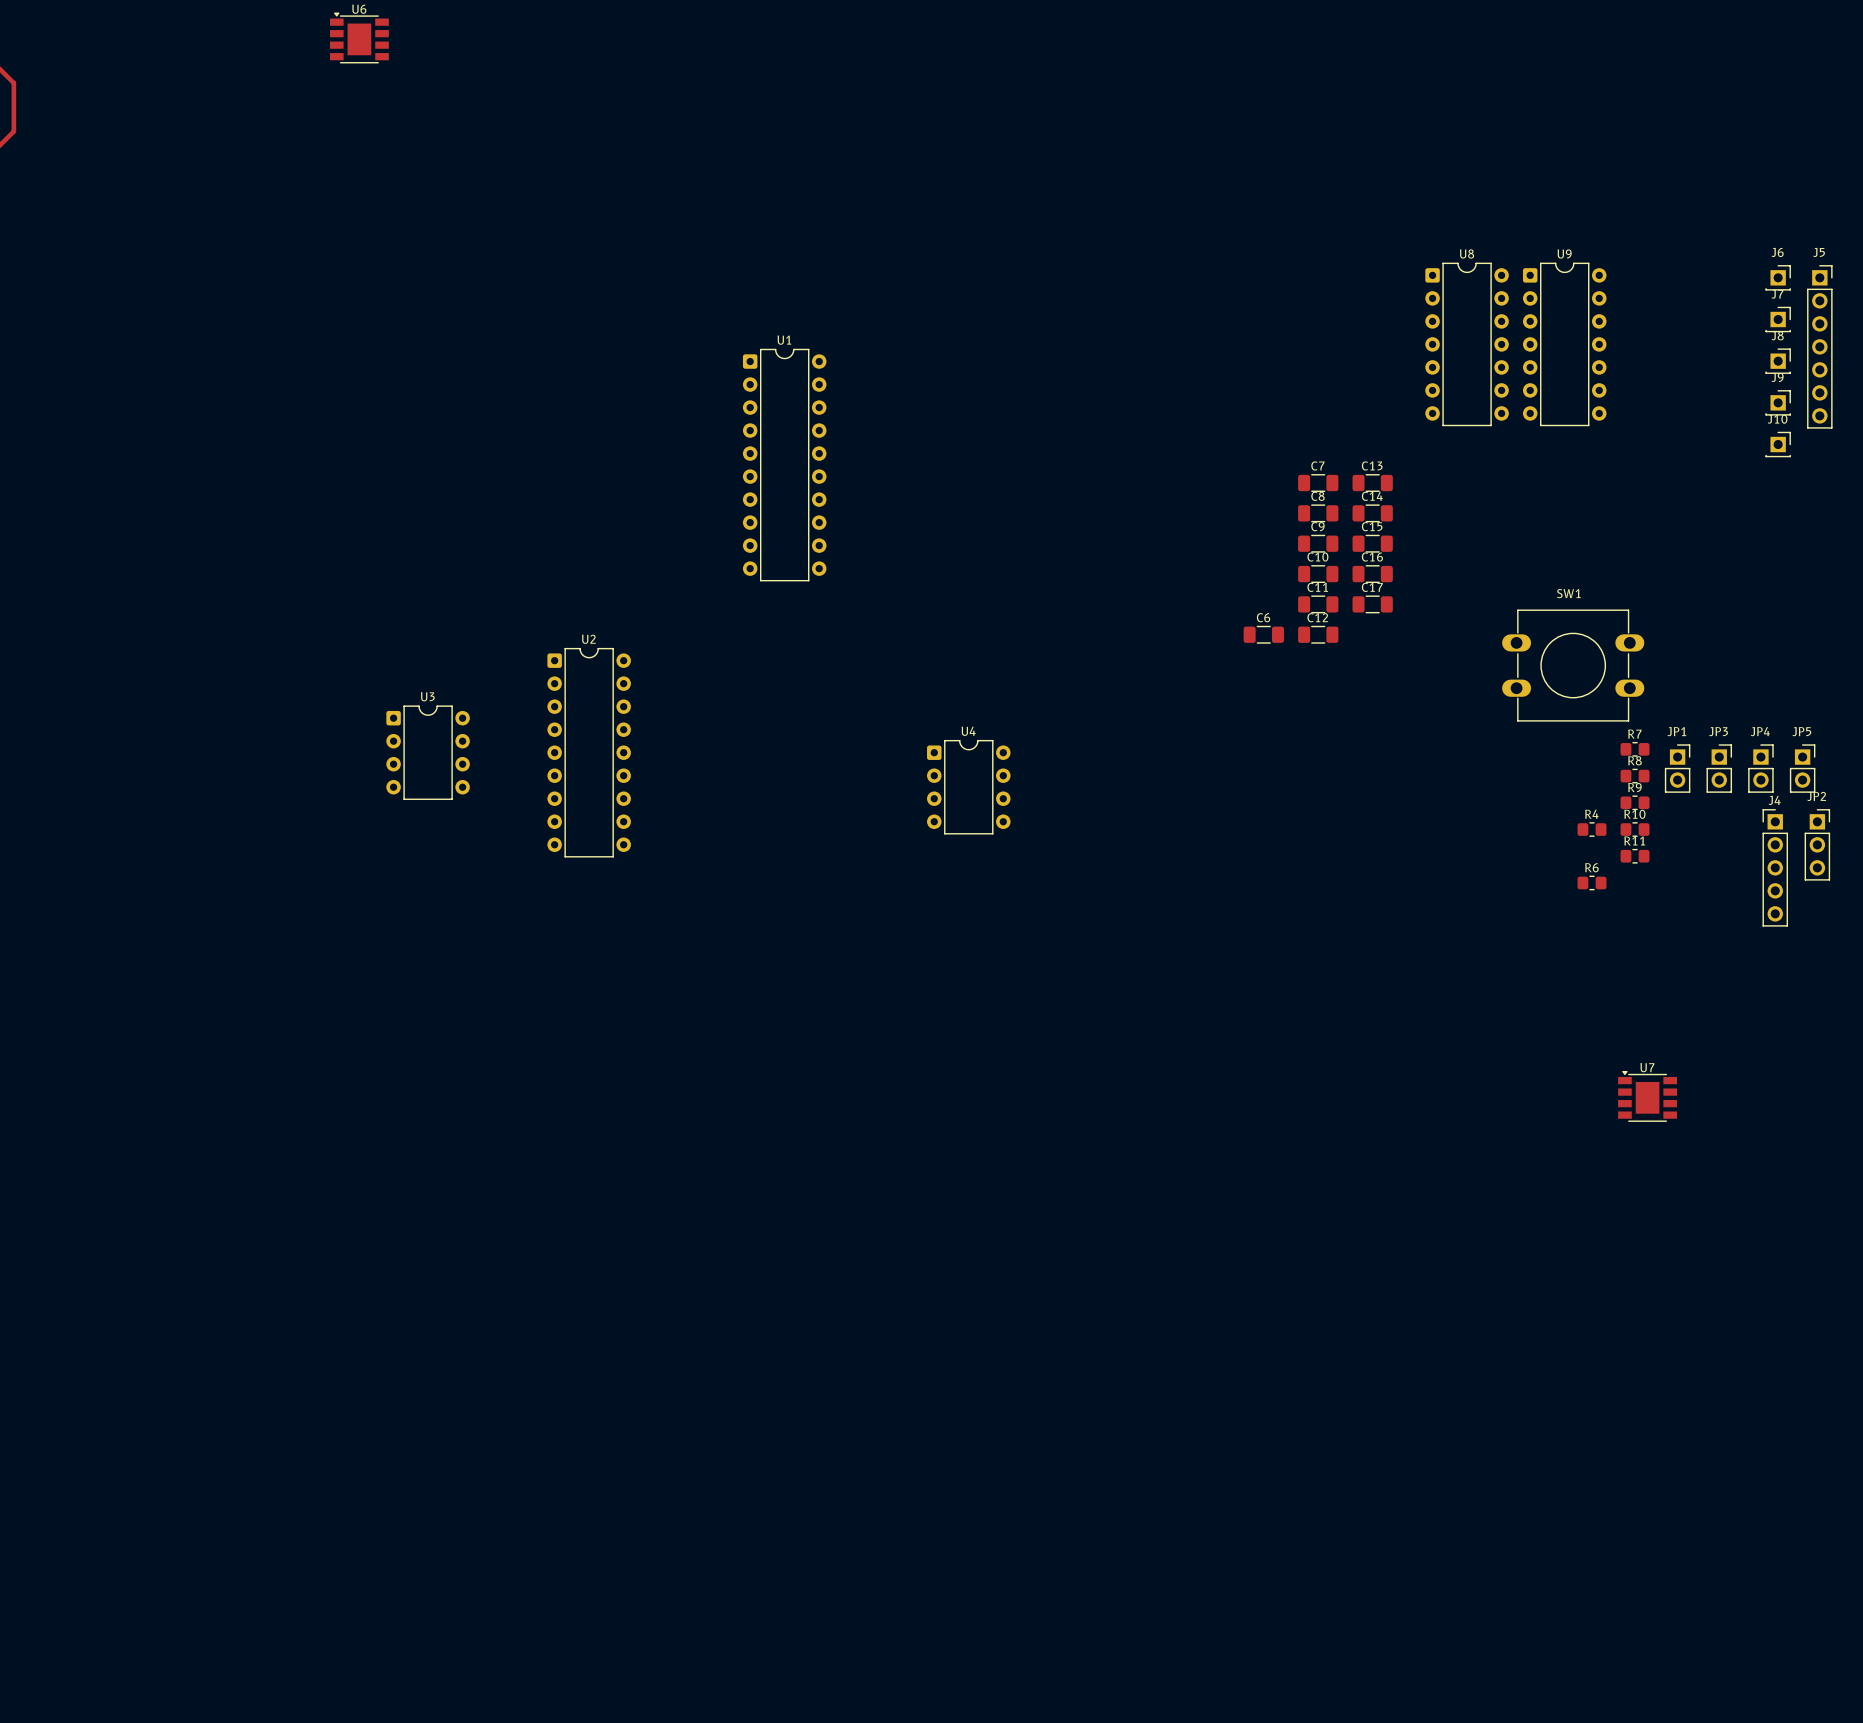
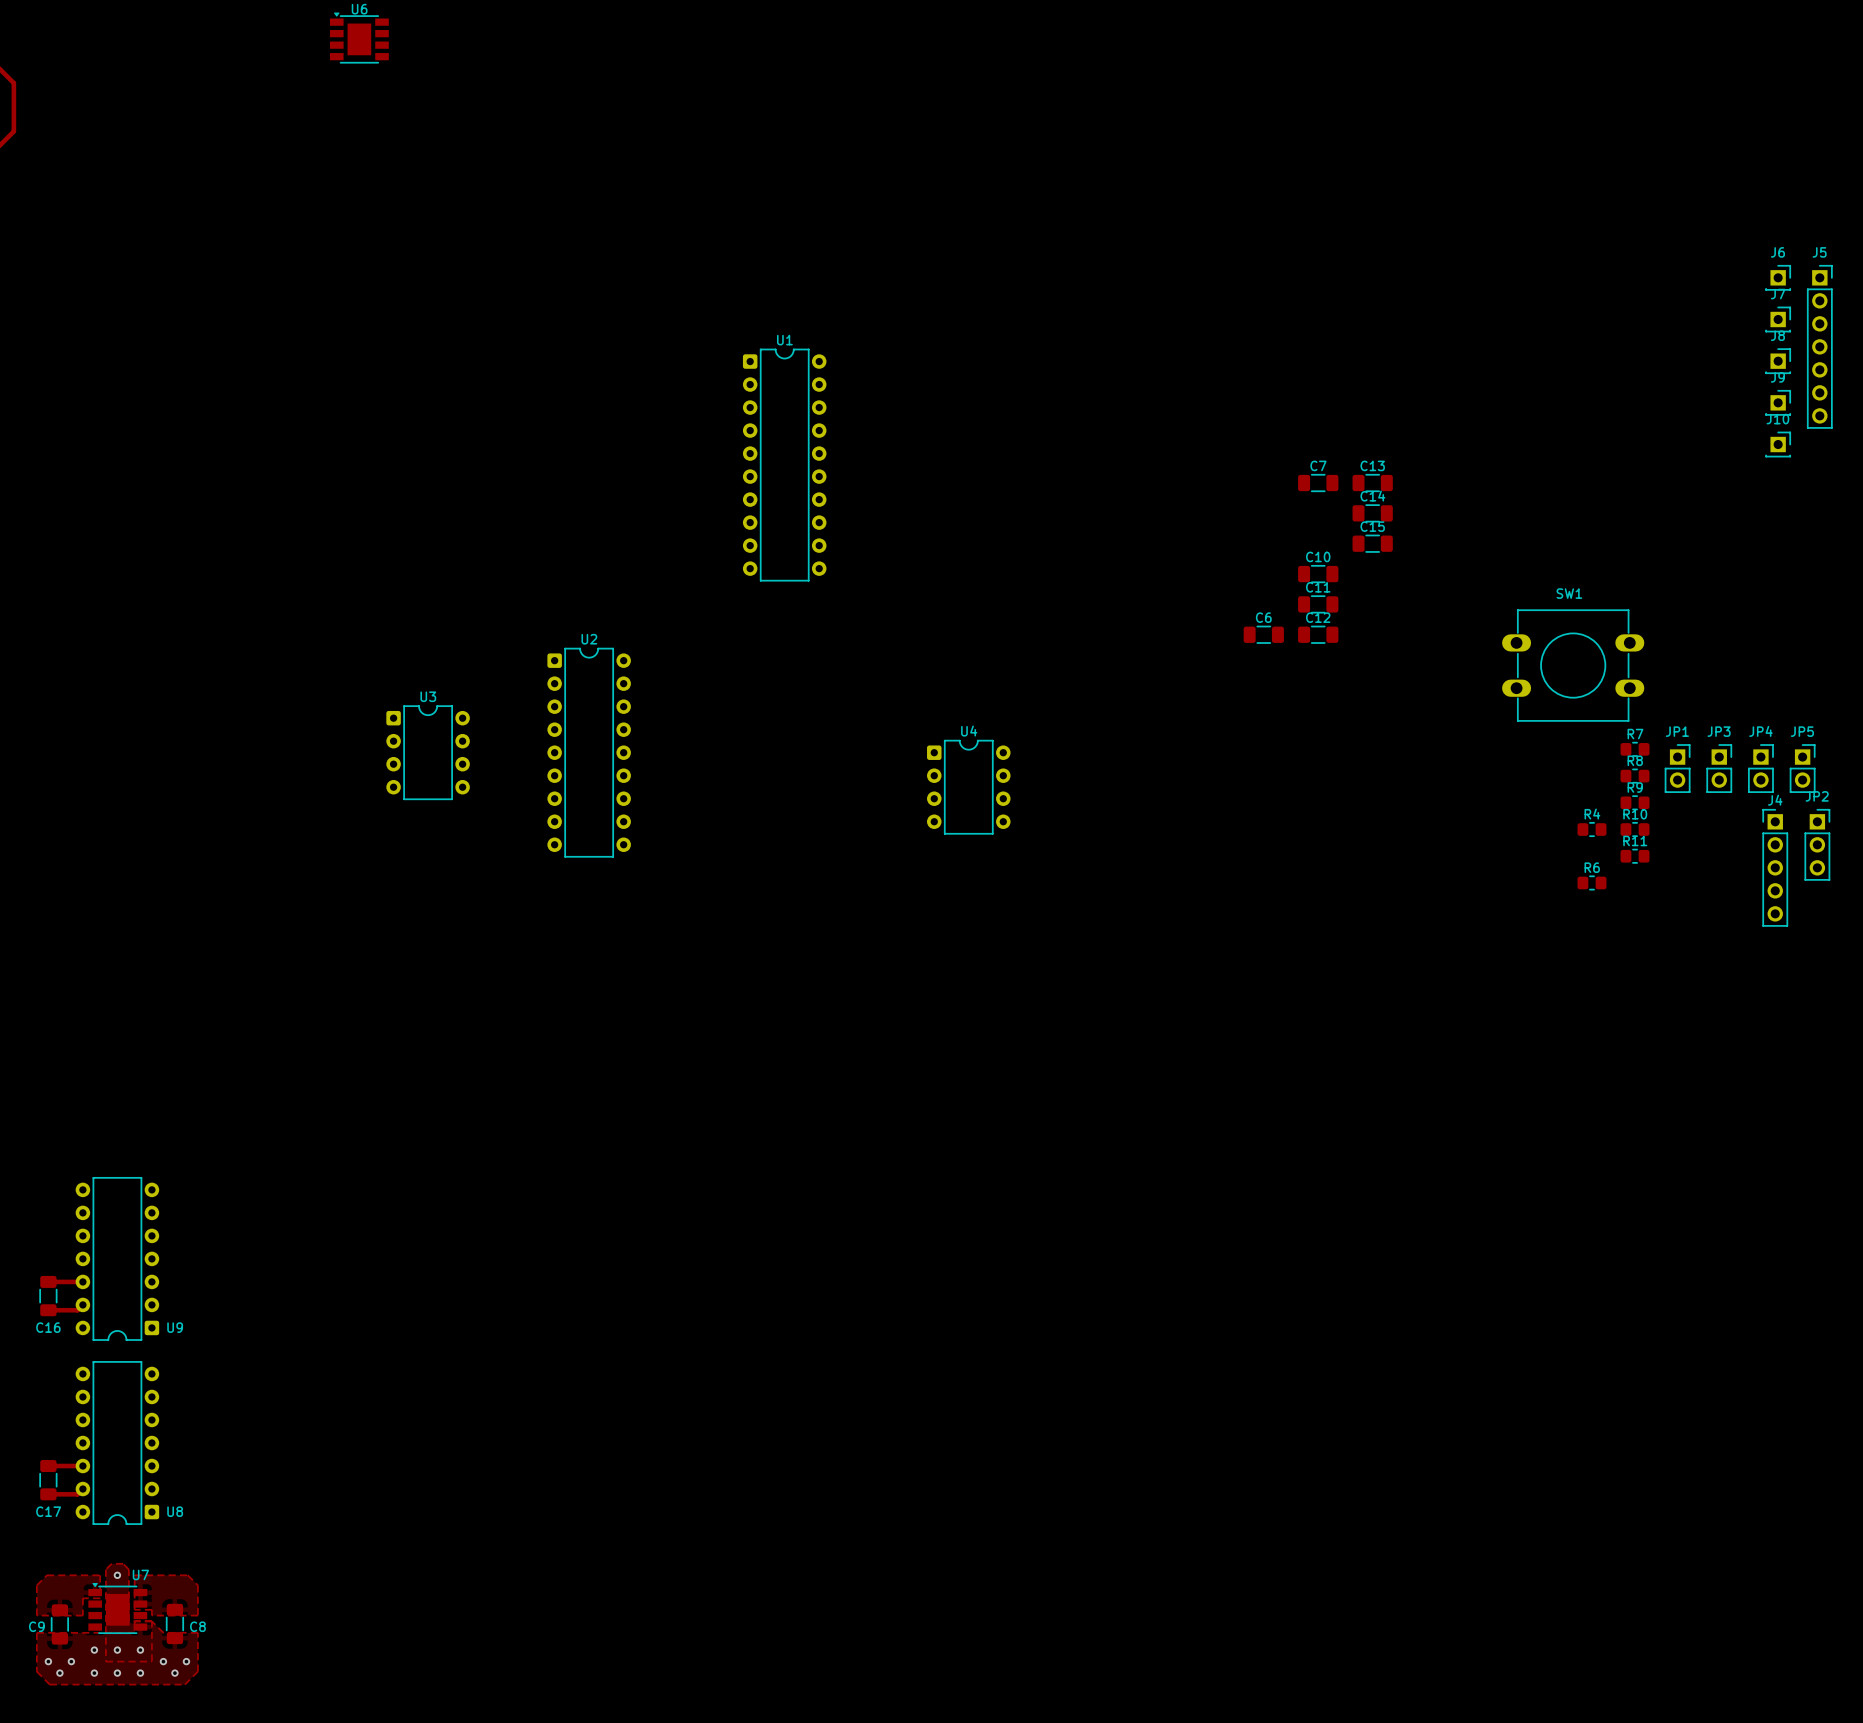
U8 name position: U8 (1467, 253) -> U8 (175, 1511)
U9 name position: U9 (1564, 253) -> U9 (175, 1327)
U8 rotation: 0° (1467, 344) -> 180° (117, 1443)
U8 position: (1467, 344) -> (117, 1443)
U9 rotation: 0° (1564, 344) -> 180° (117, 1258)
U9 position: (1564, 344) -> (117, 1258)
C8 rotation: 0° (1318, 513) -> 90° clockwise (174, 1623)
C8 position: (1318, 513) -> (174, 1623)
C9 name position: C9 (1317, 526) -> C9 (36, 1626)
C9 rotation: 0° (1318, 543) -> 90° clockwise (59, 1624)
C9 position: (1318, 543) -> (59, 1624)
C16 name position: C16 (1372, 557) -> C16 (48, 1327)
C16 rotation: 0° (1372, 574) -> 90° clockwise (48, 1296)
C16 position: (1372, 574) -> (48, 1296)
C17 name position: C17 (1372, 587) -> C17 (48, 1511)
C17 rotation: 0° (1372, 604) -> 90° clockwise (48, 1480)
C17 position: (1372, 604) -> (48, 1480)
U7 name position: U7 (1647, 1067) -> U7 (140, 1574)
U7 position: (1647, 1096) -> (117, 1608)
top track: none -> (48, 1281) (82, 1281)
top track: none -> (82, 1304) (77, 1310) (48, 1310)
top track: none -> (48, 1466) (82, 1466)
top track: none -> (82, 1489) (77, 1494) (48, 1494)
top zone outline: none -> (46, 1575) (100, 1575) (100, 1598) (82, 1598) (82, 1615) (36, 1615) (36, 1585) (46, 1575)
via: none -> (117, 1575)
top zone outline: none -> (134, 1575) (134, 1609) (151, 1609) (151, 1615) (197, 1615) (197, 1585) (187, 1575) (134, 1575)
top zone outline: none -> (134, 1621) (134, 1632) (36, 1632) (36, 1671) (49, 1684) (185, 1684) (197, 1671) (197, 1632) (163, 1632) (151, 1621)
top zone outline: none -> (151, 1621) (151, 1661) (105, 1661) (105, 1569) (111, 1563) (123, 1563) (128, 1569) (128, 1621) (151, 1621)
via: none -> (94, 1650)
via: none -> (117, 1650)
via: none -> (140, 1650)
via: none -> (48, 1661)
via: none -> (71, 1661)
via: none -> (163, 1661)
via: none -> (186, 1661)
via: none -> (59, 1673)
via: none -> (94, 1673)
via: none -> (117, 1673)
via: none -> (140, 1673)
via: none -> (174, 1673)

